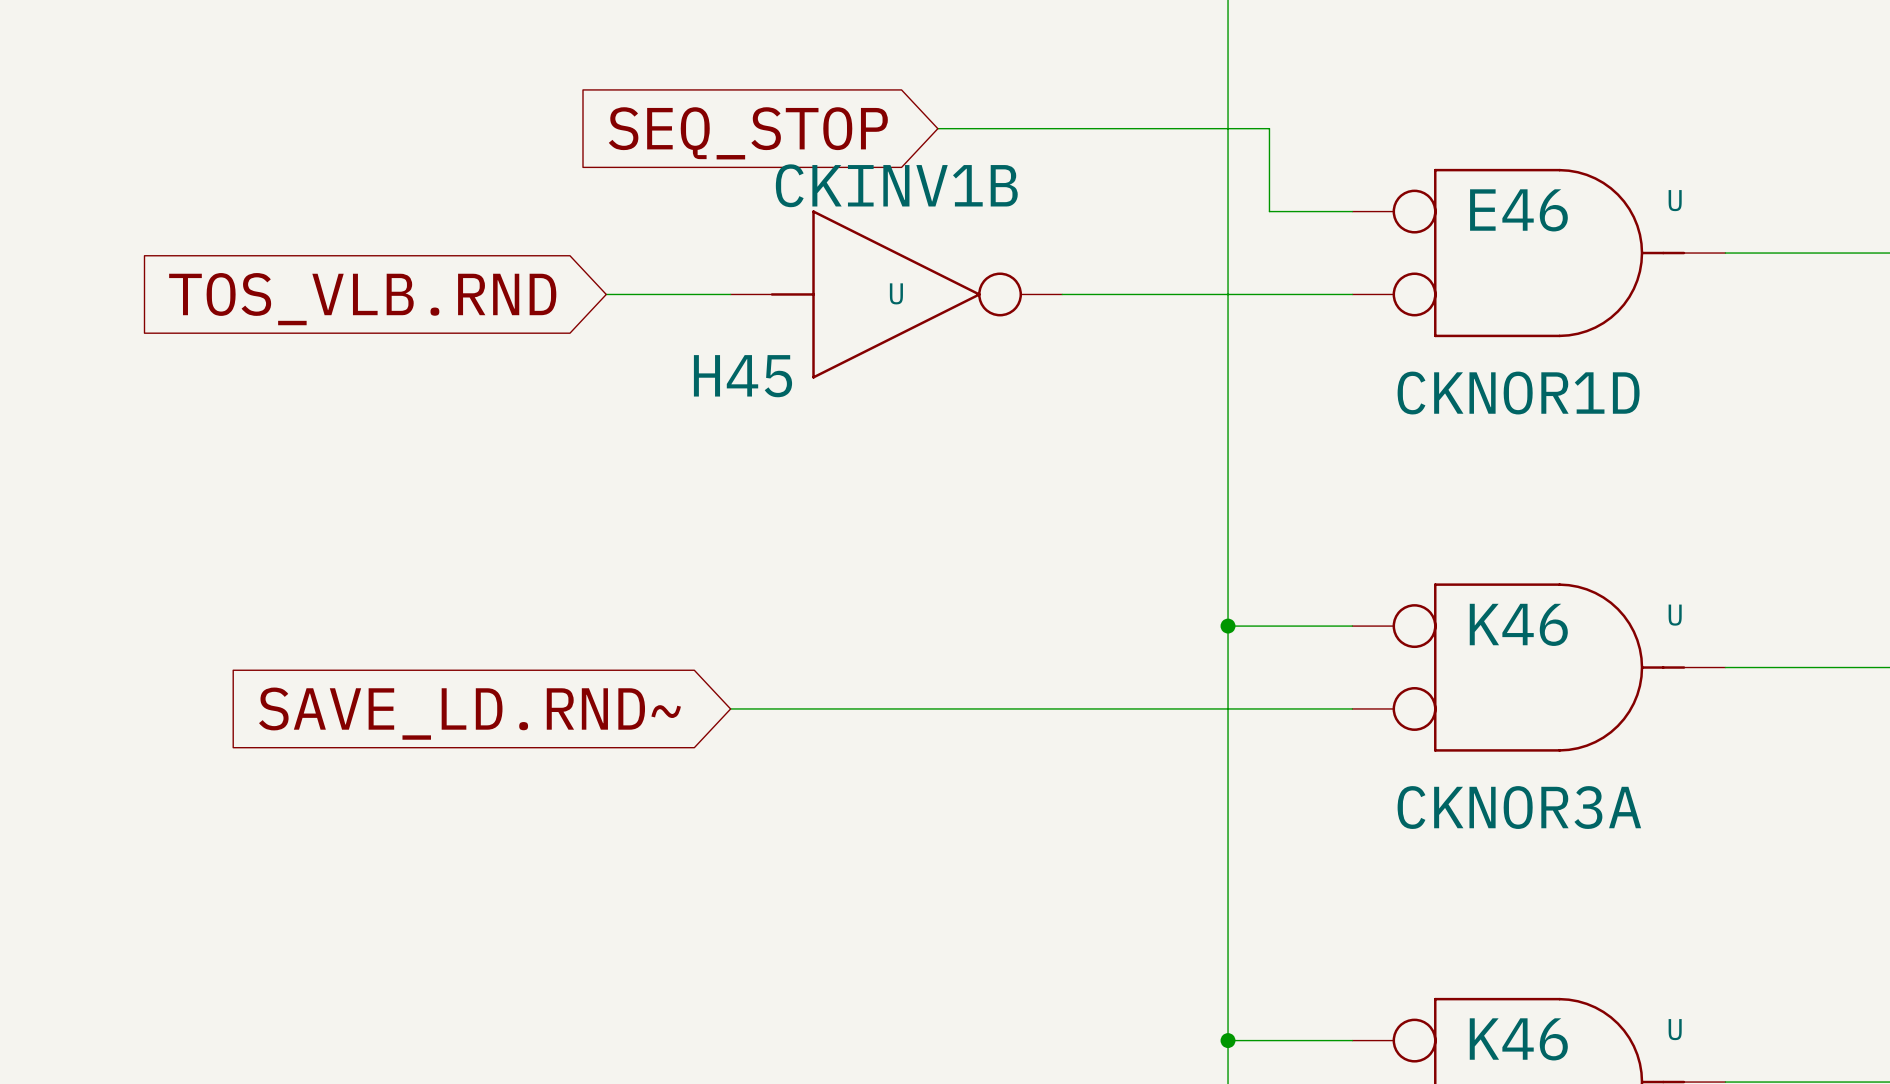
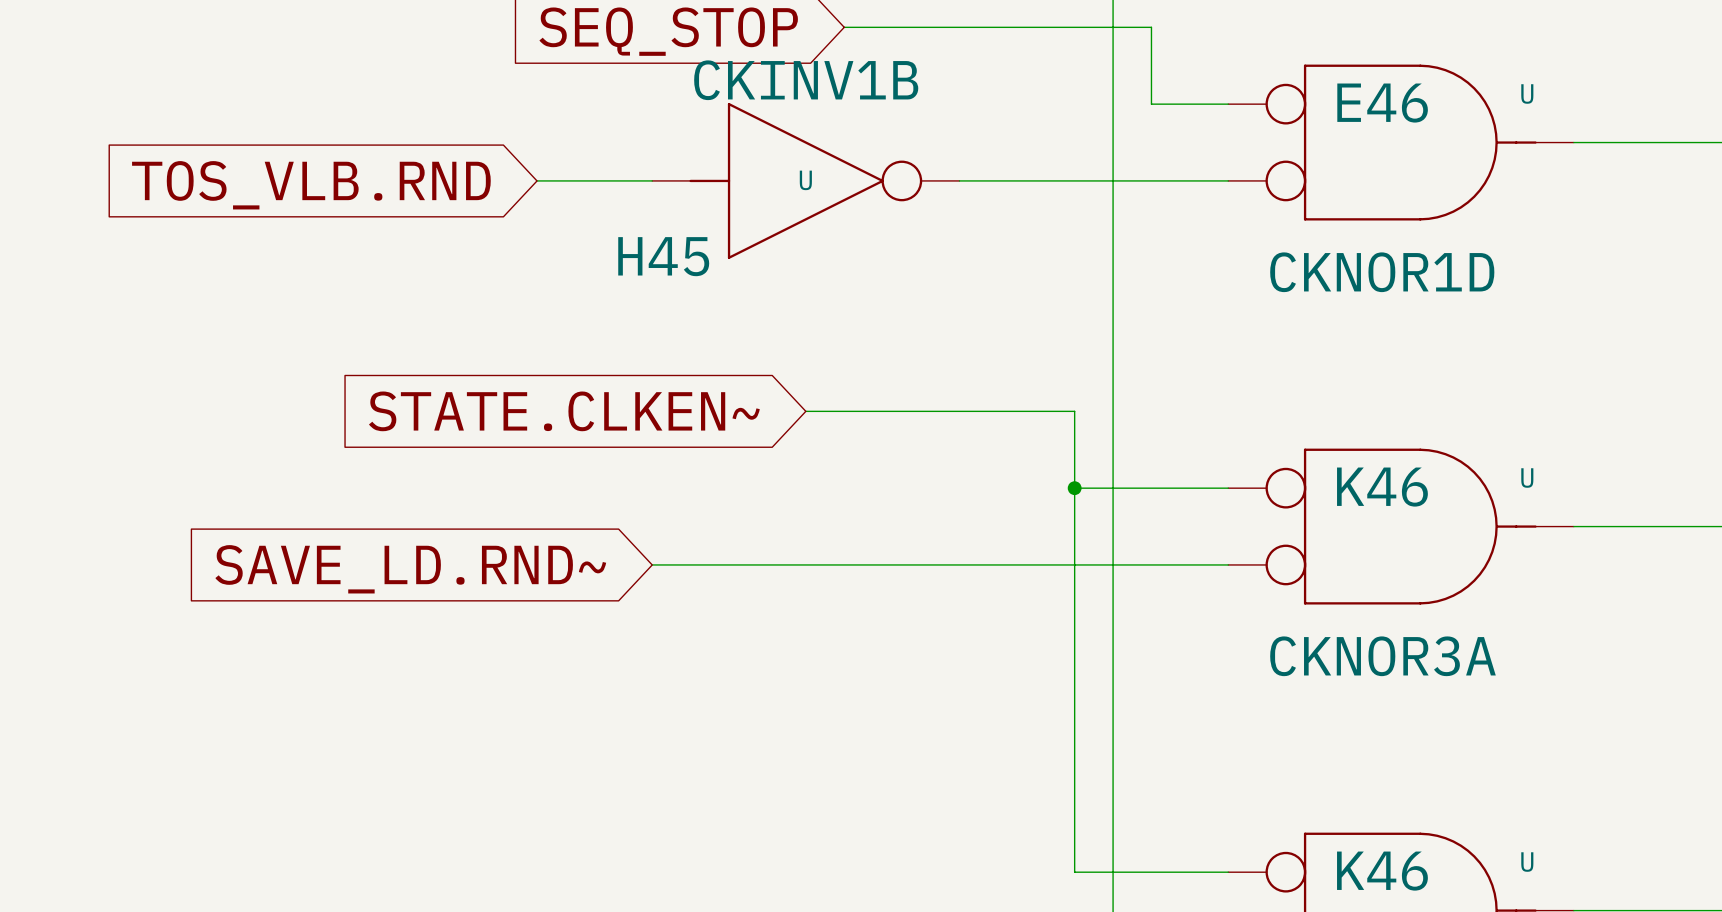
global label: none -> STATE.CLKEN~ (564, 411)
wire: none -> (805, 411) (1074, 411) (1074, 872) (1113, 872)
wire: none -> (1074, 488) (1113, 488)
junction position: (1228, 626) -> (1074, 488)
junction: (1228, 1040) -> none

